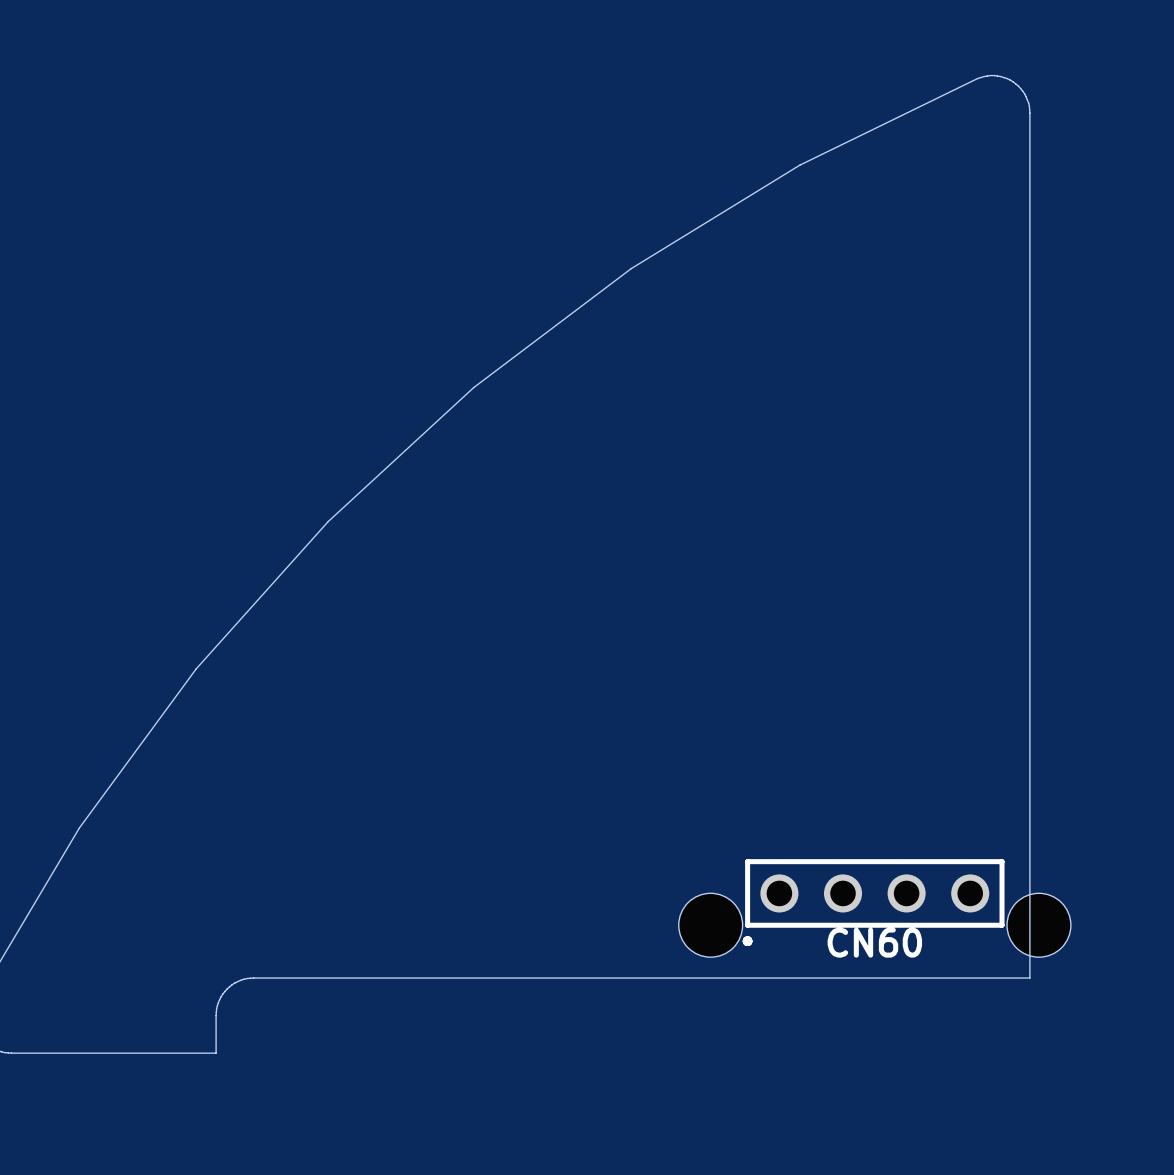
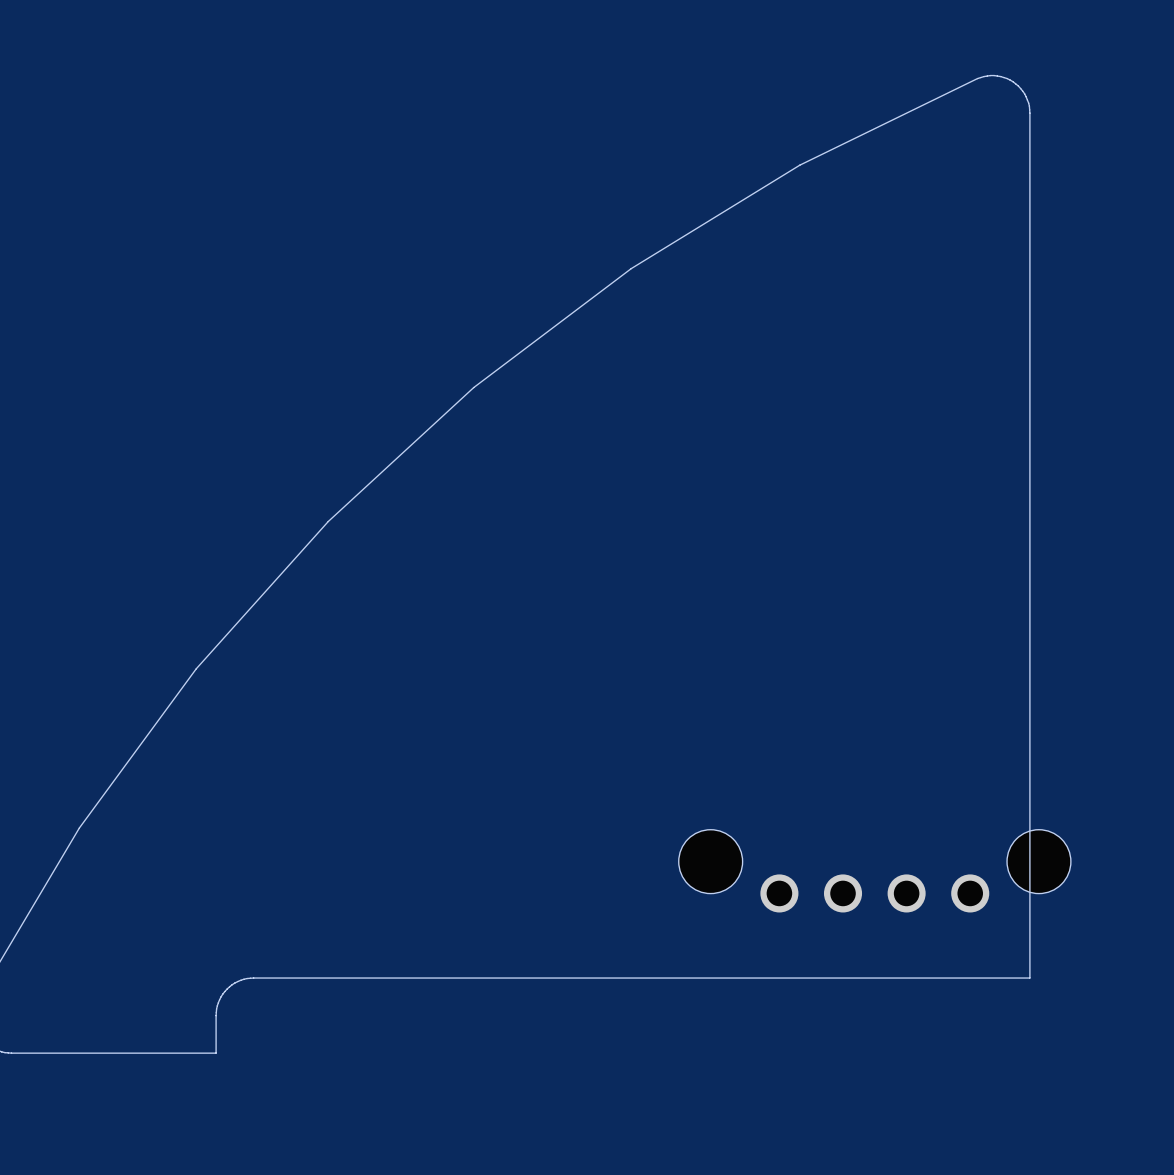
CN60 side: bottom (874, 908) -> top (874, 871)

